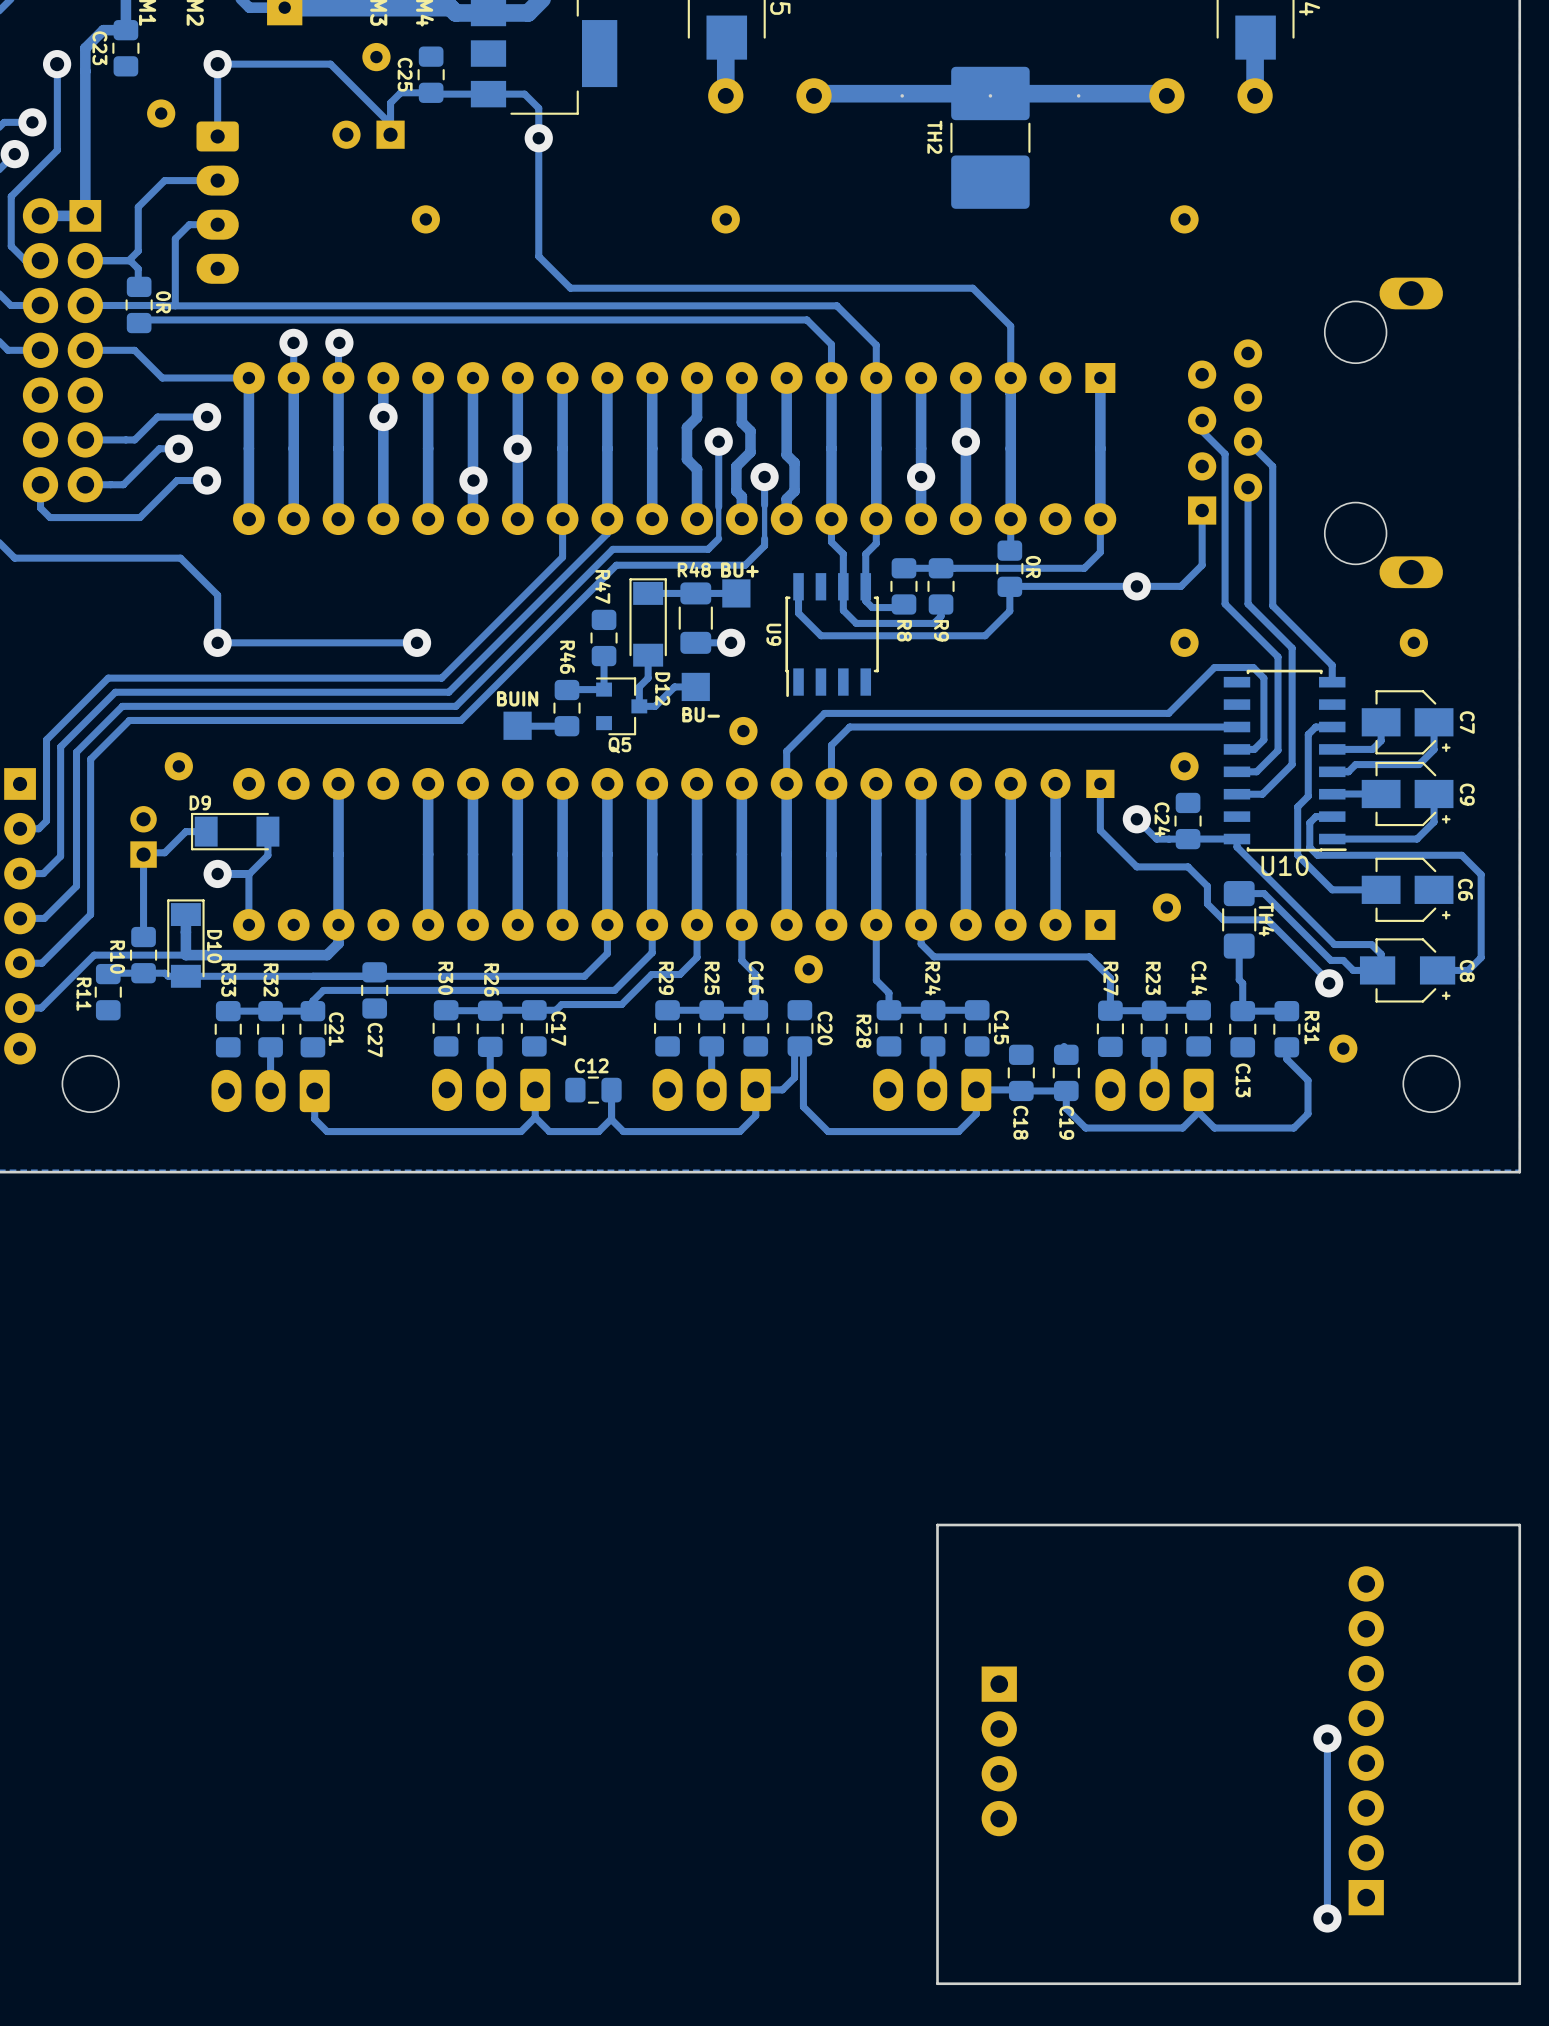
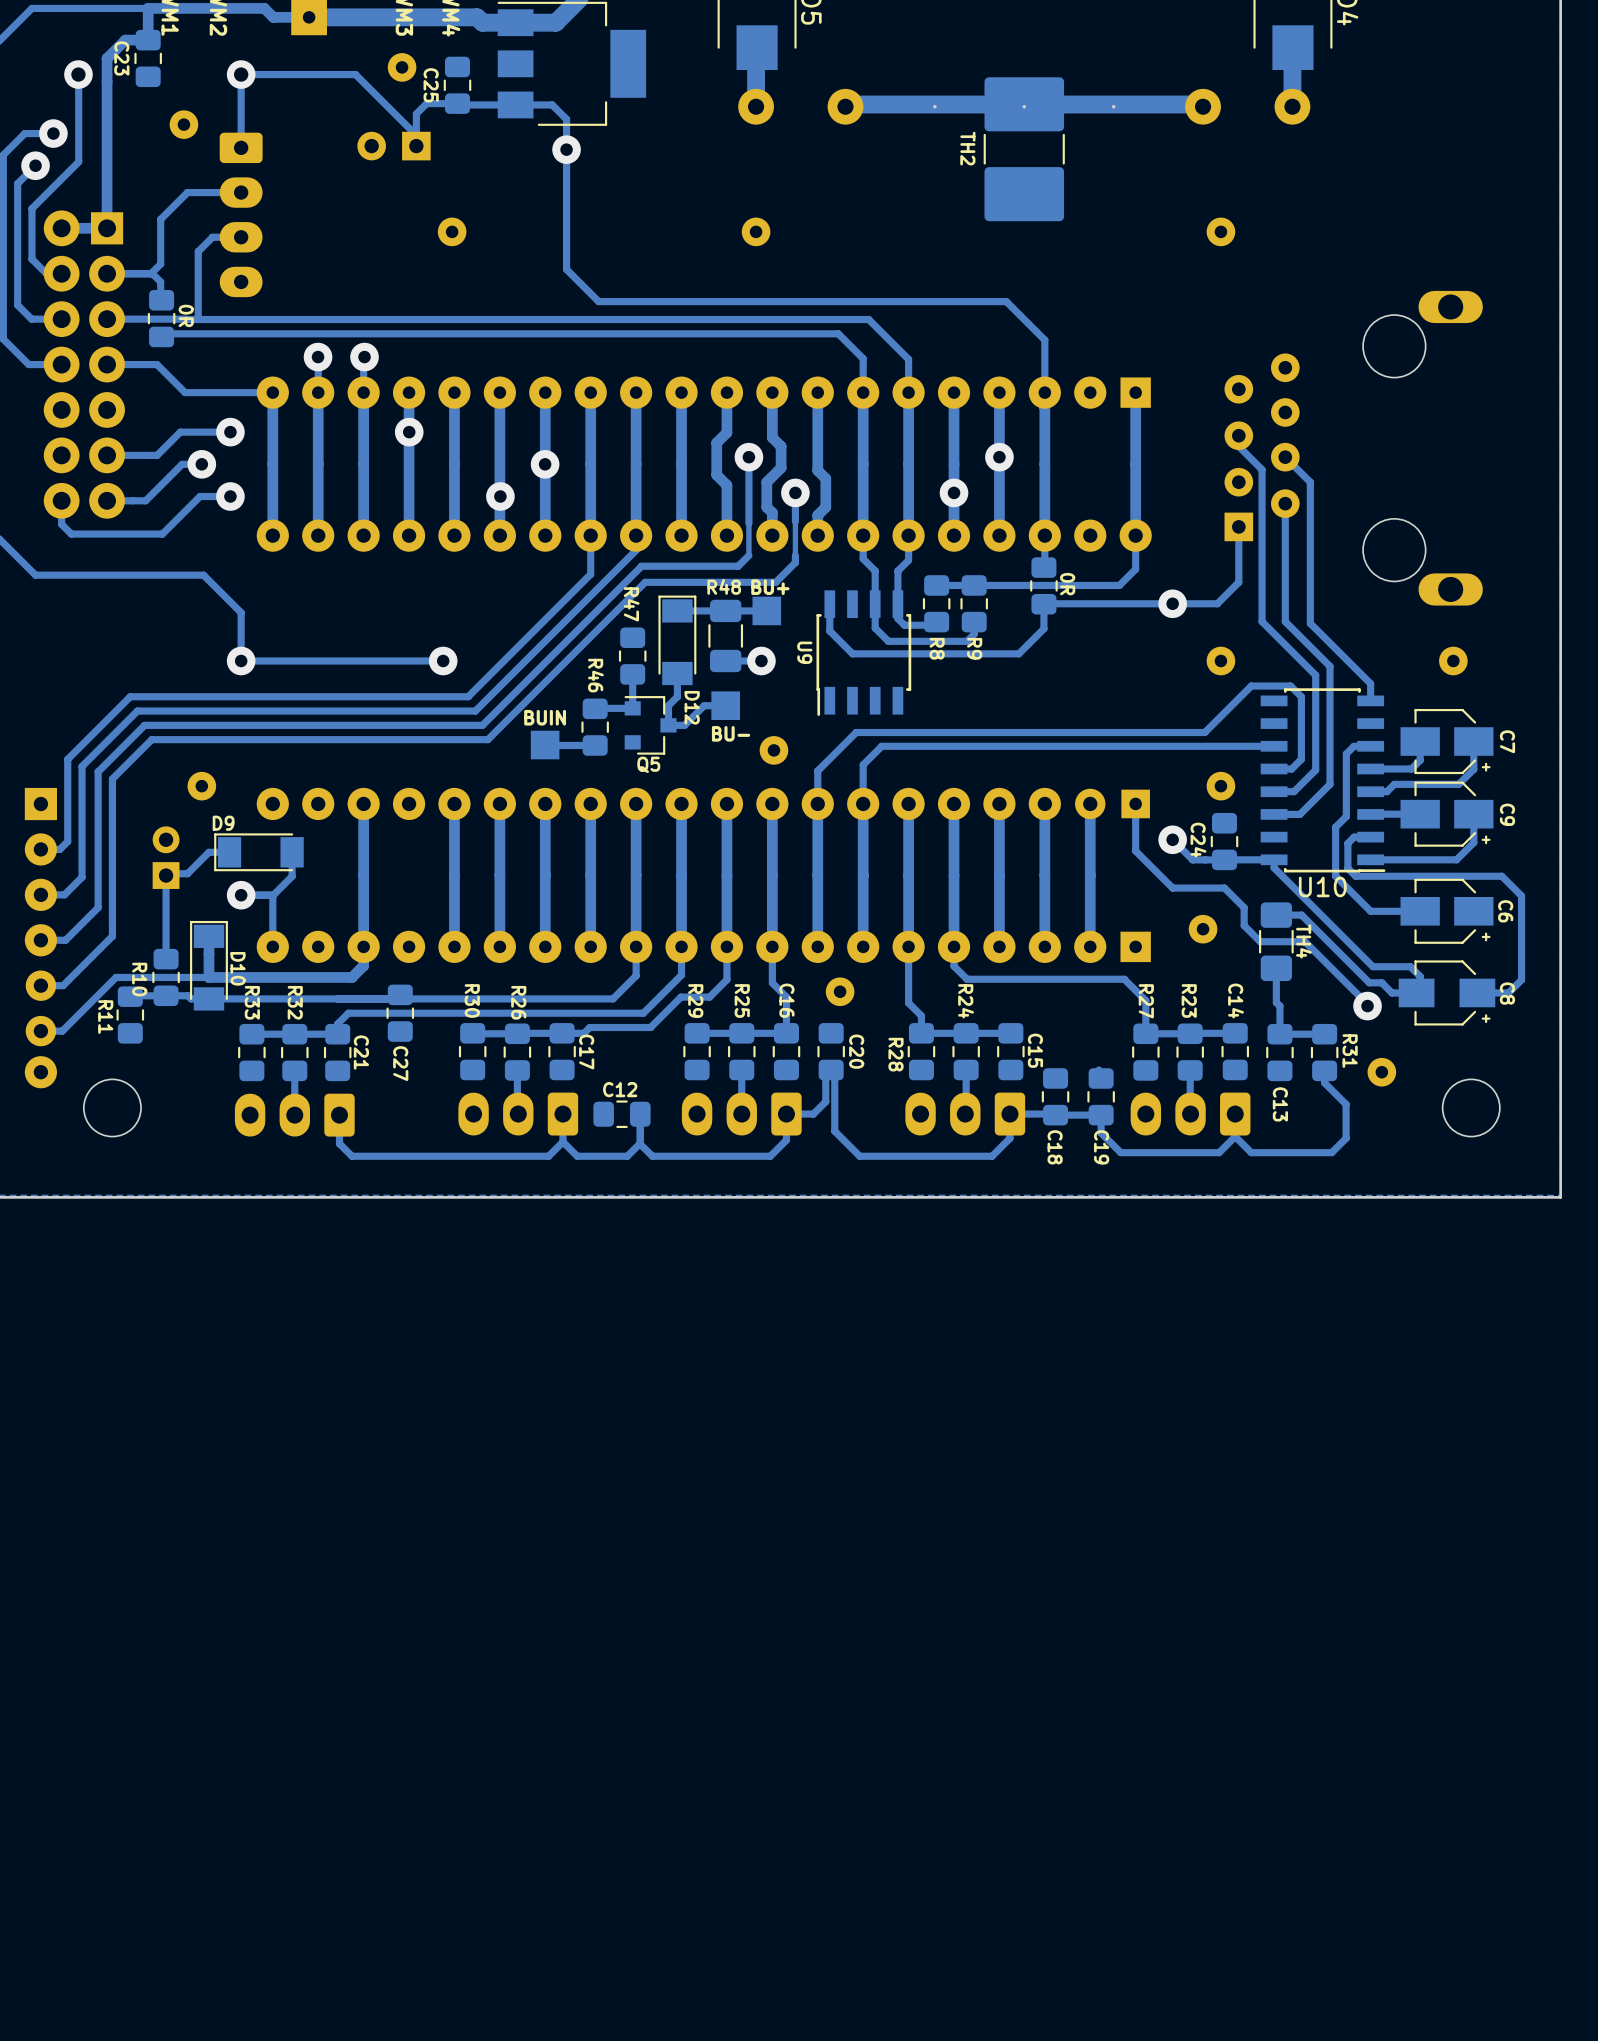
board edge: (1519, 1525) (1519, 1983) (937, 1983) (937, 1525) (1519, 1525) -> none
track: (1327, 1738) (1327, 1918) -> none
via: (1327, 1738) -> none
part: (1366, 1740) -> none
part: (999, 1751) -> none
via: (1327, 1918) -> none

